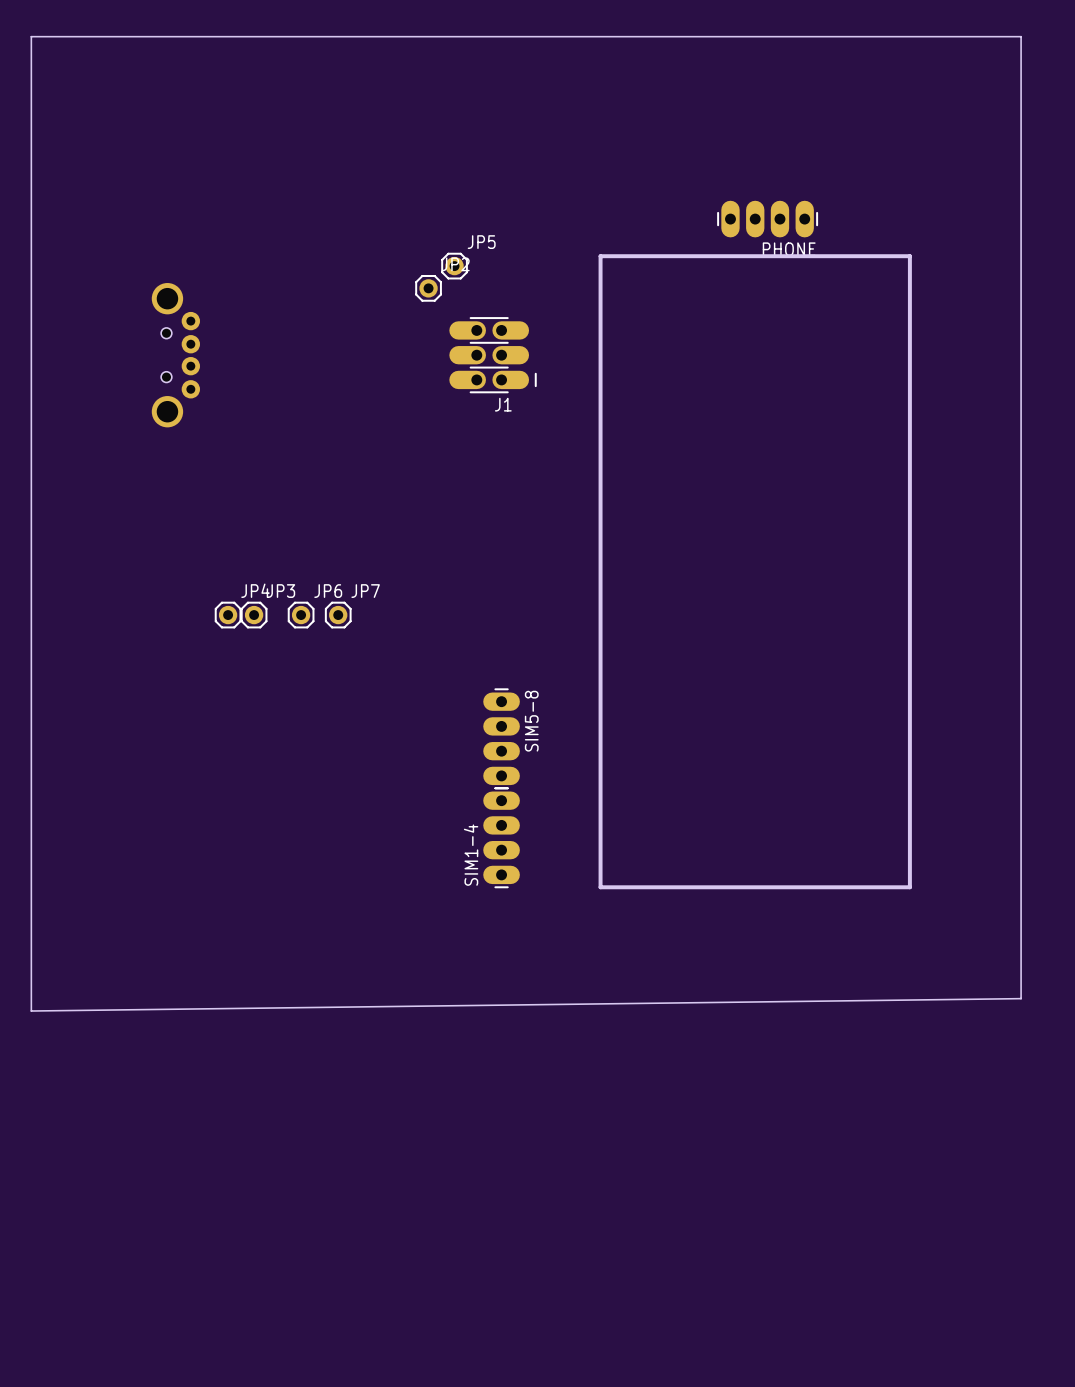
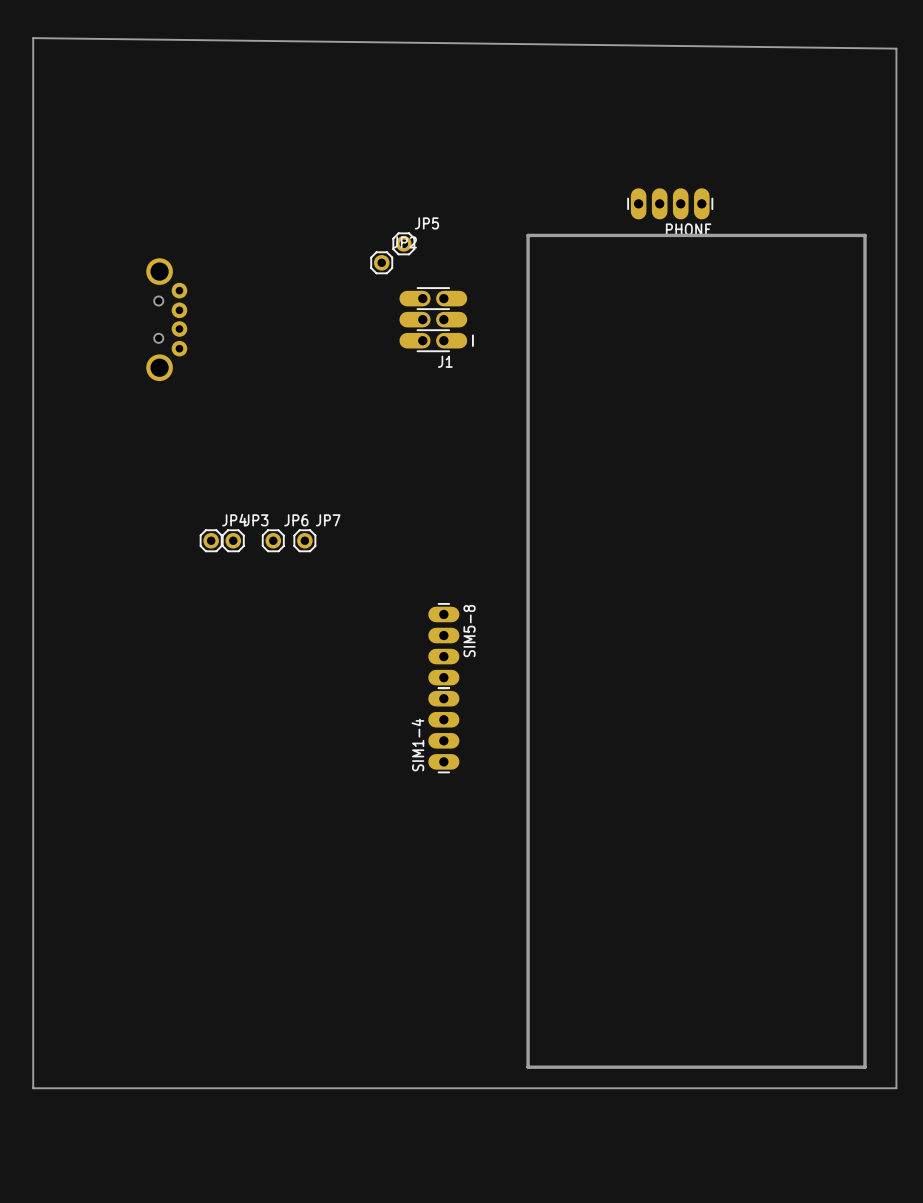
board edge: (31, 36) (1021, 36) (1021, 998) (31, 1011) (31, 36) -> (33, 38) (33, 1088) (896, 1088) (896, 48) (33, 38)
board edge: (909, 256) (909, 887) (600, 887) -> (791, 235) (865, 235) (865, 1067) (528, 1067) (528, 772)

